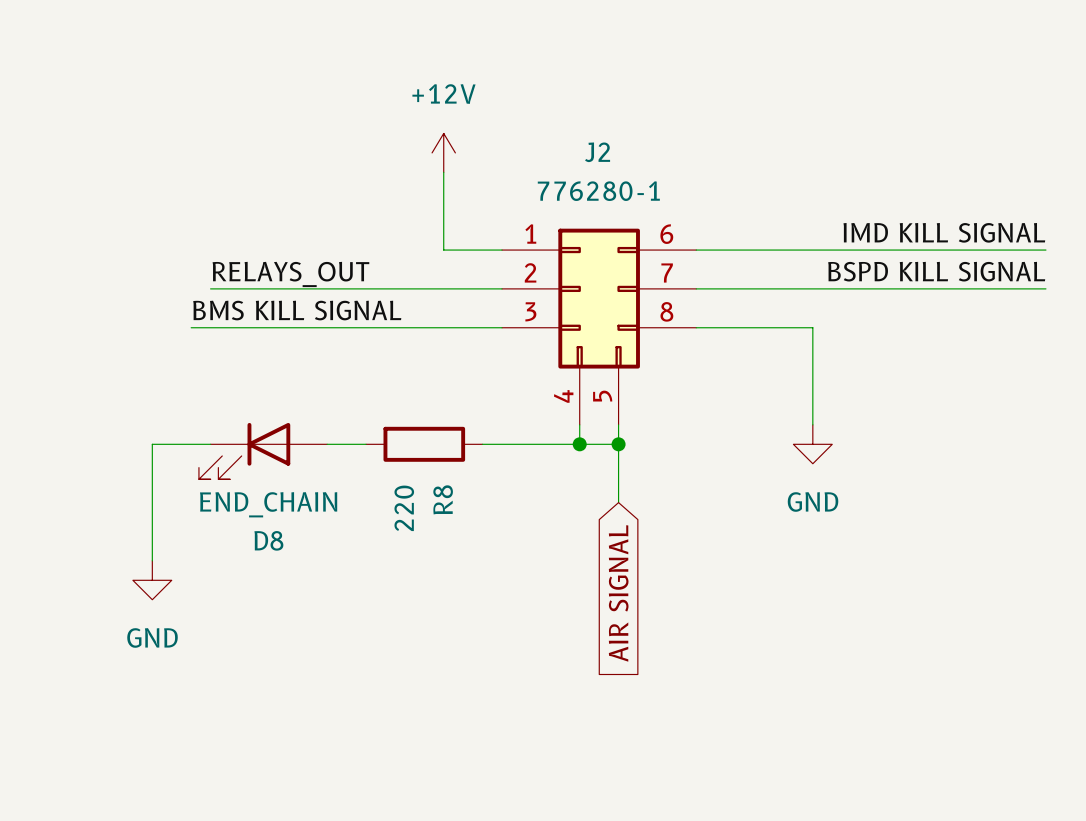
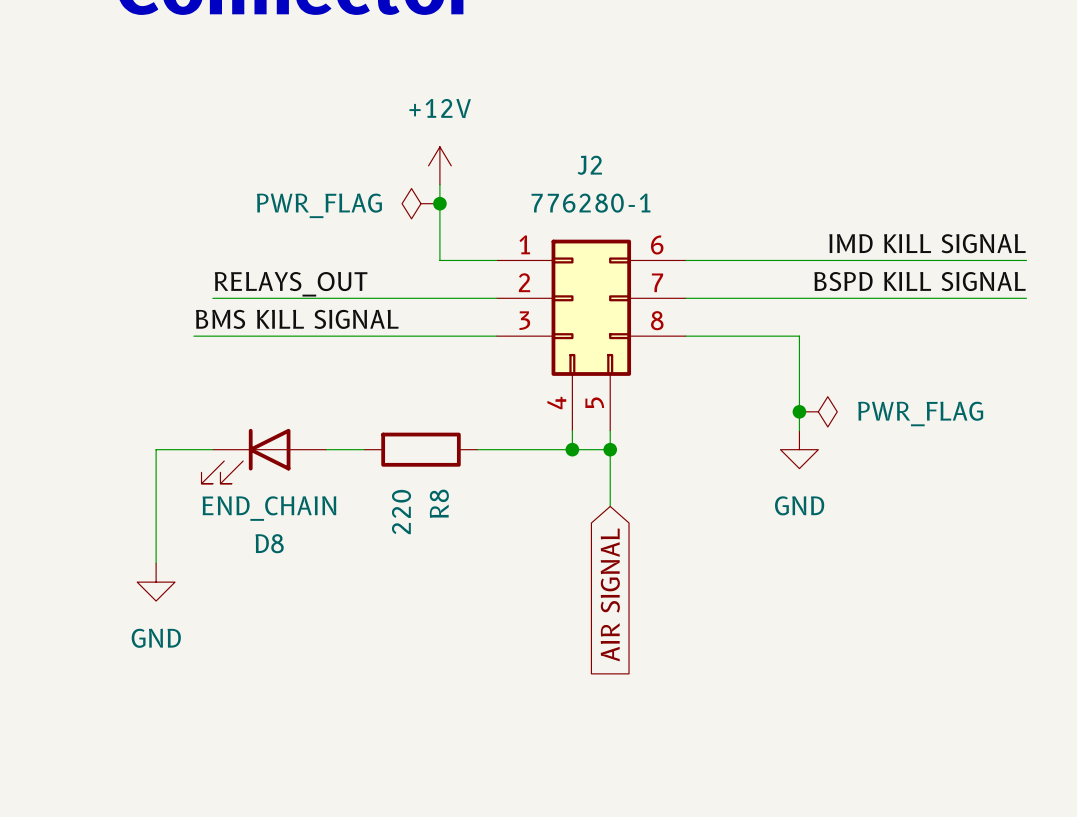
power symbol: none -> PWR_FLAG (421, 203)
junction: none -> (439, 203)
junction: none -> (799, 411)
power symbol: none -> PWR_FLAG (818, 411)

